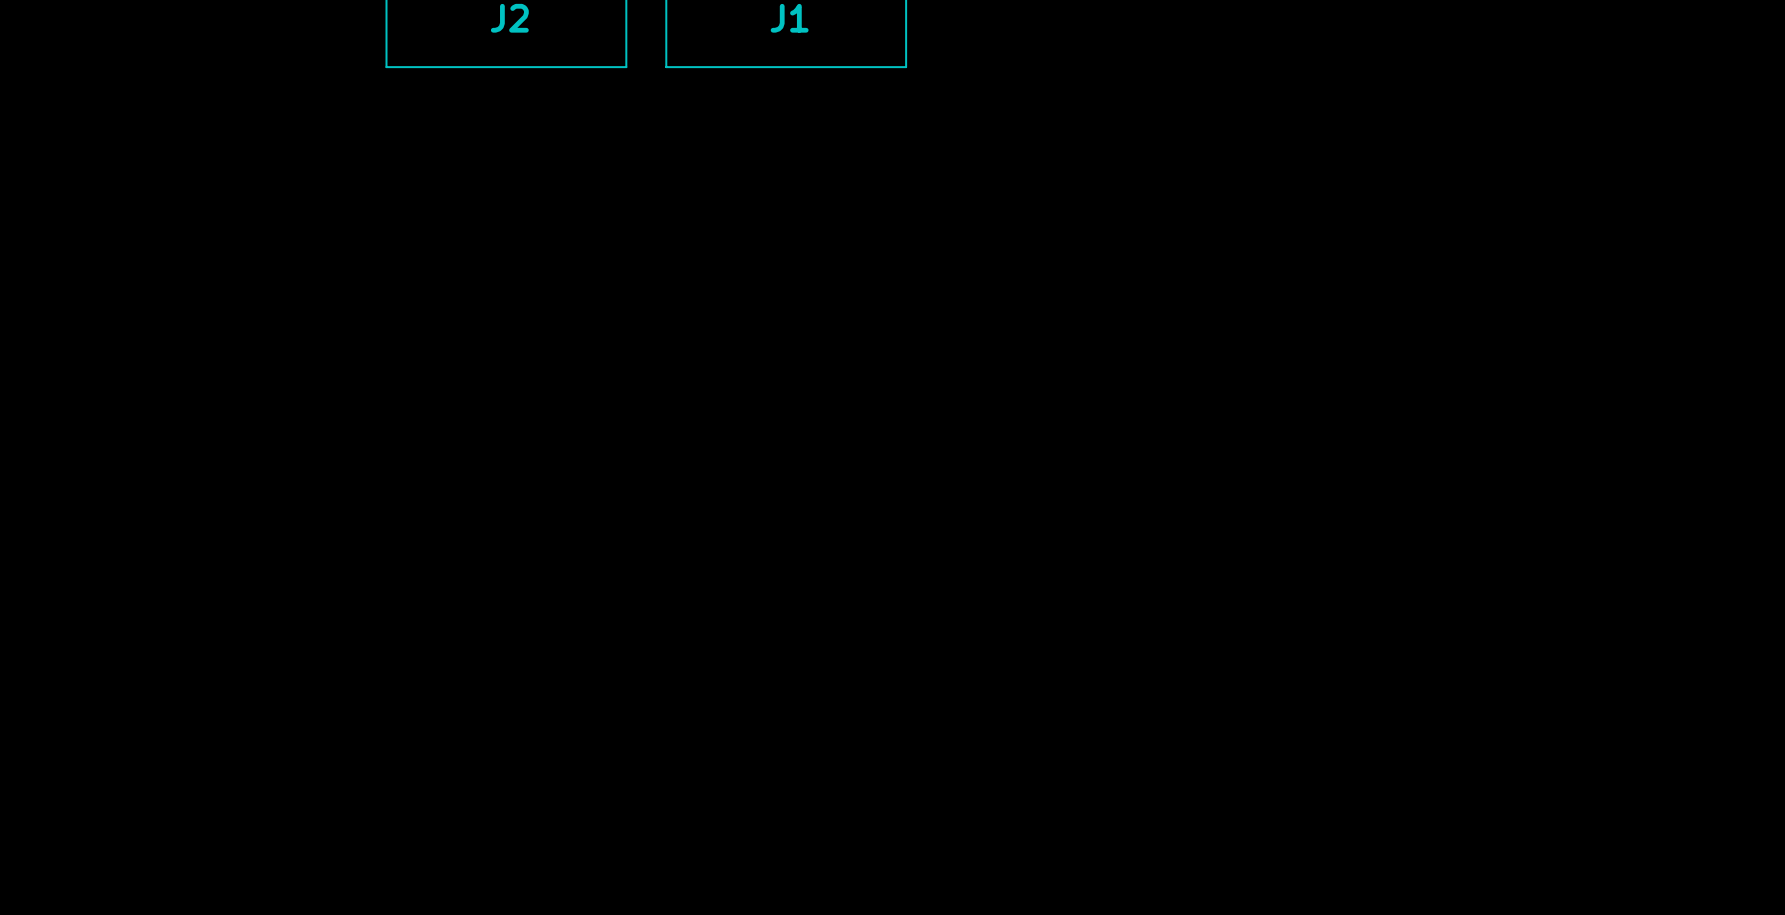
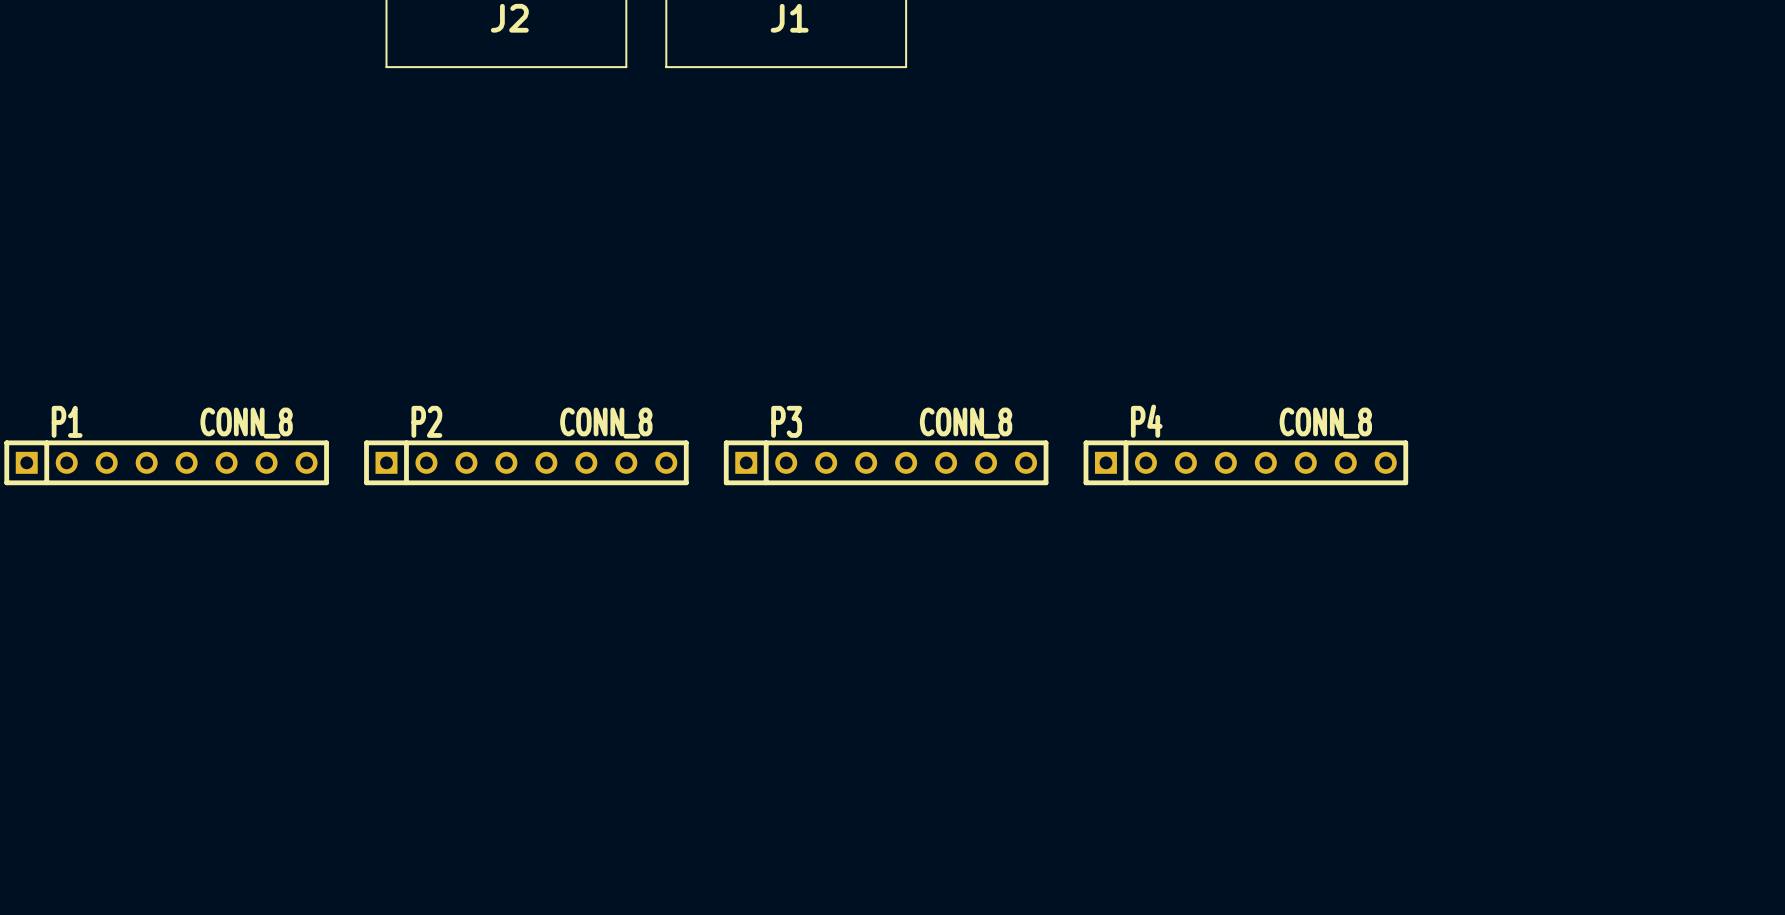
P1: none -> CONN_8 (166, 462)
P2: none -> CONN_8 (526, 462)
P3: none -> CONN_8 (886, 462)
P4: none -> CONN_8 (1245, 462)

